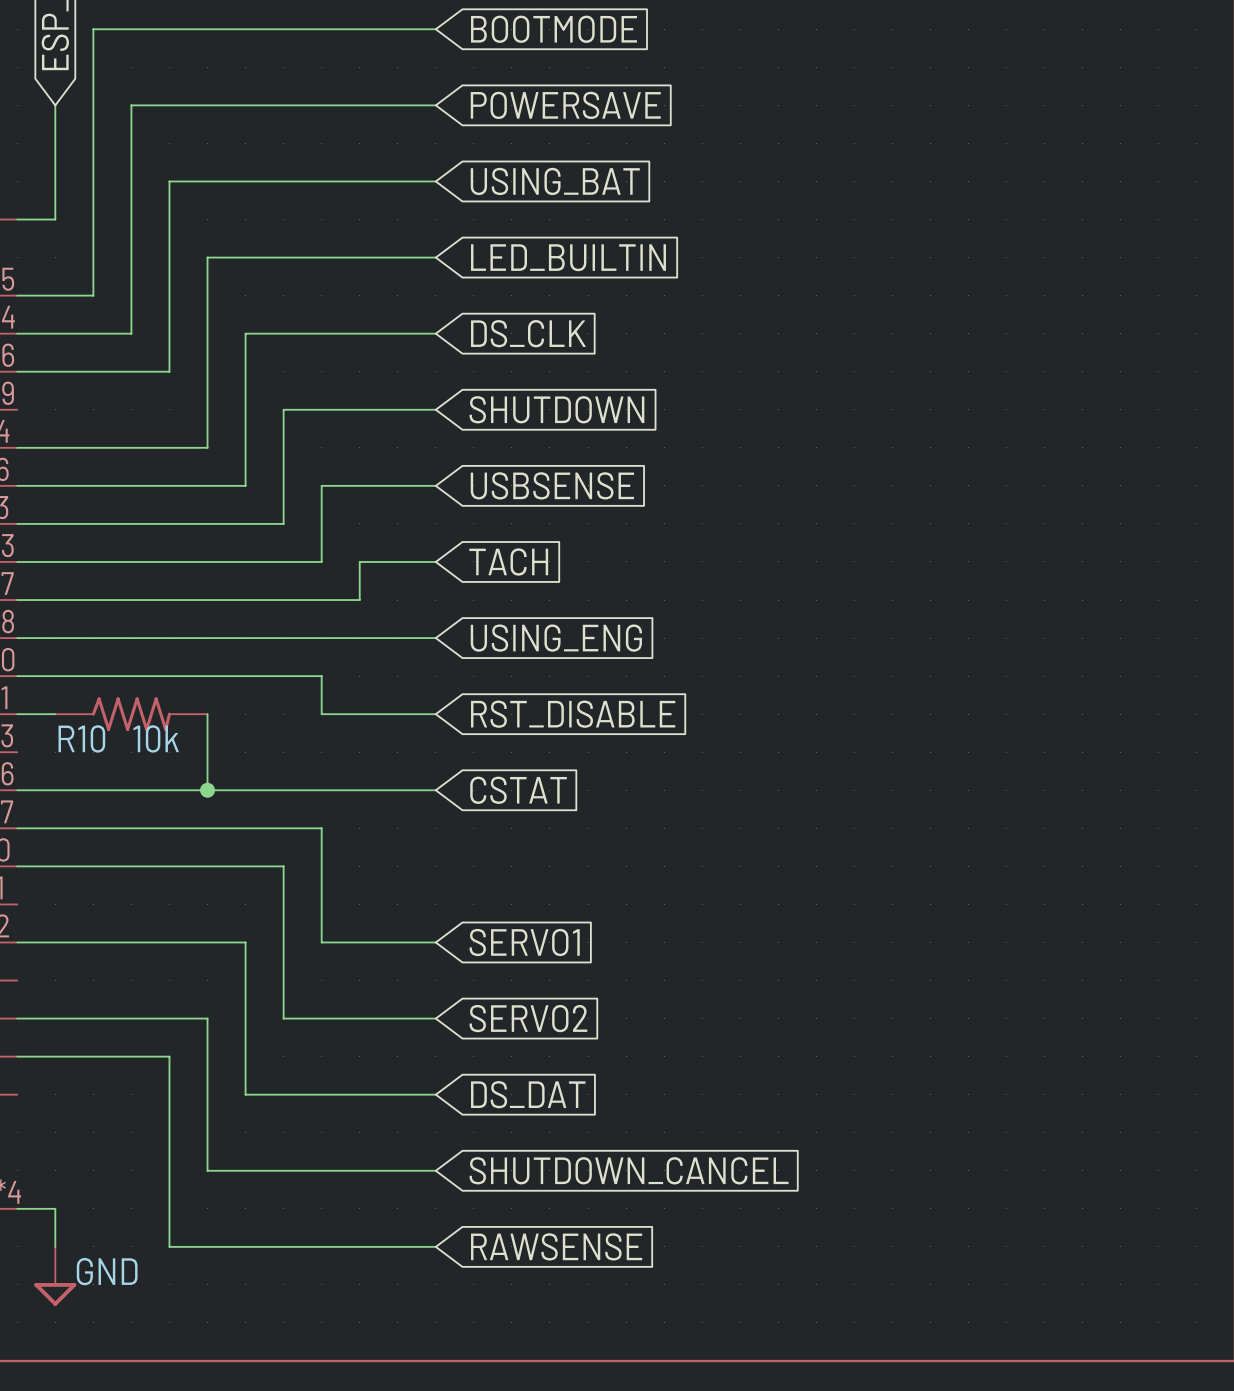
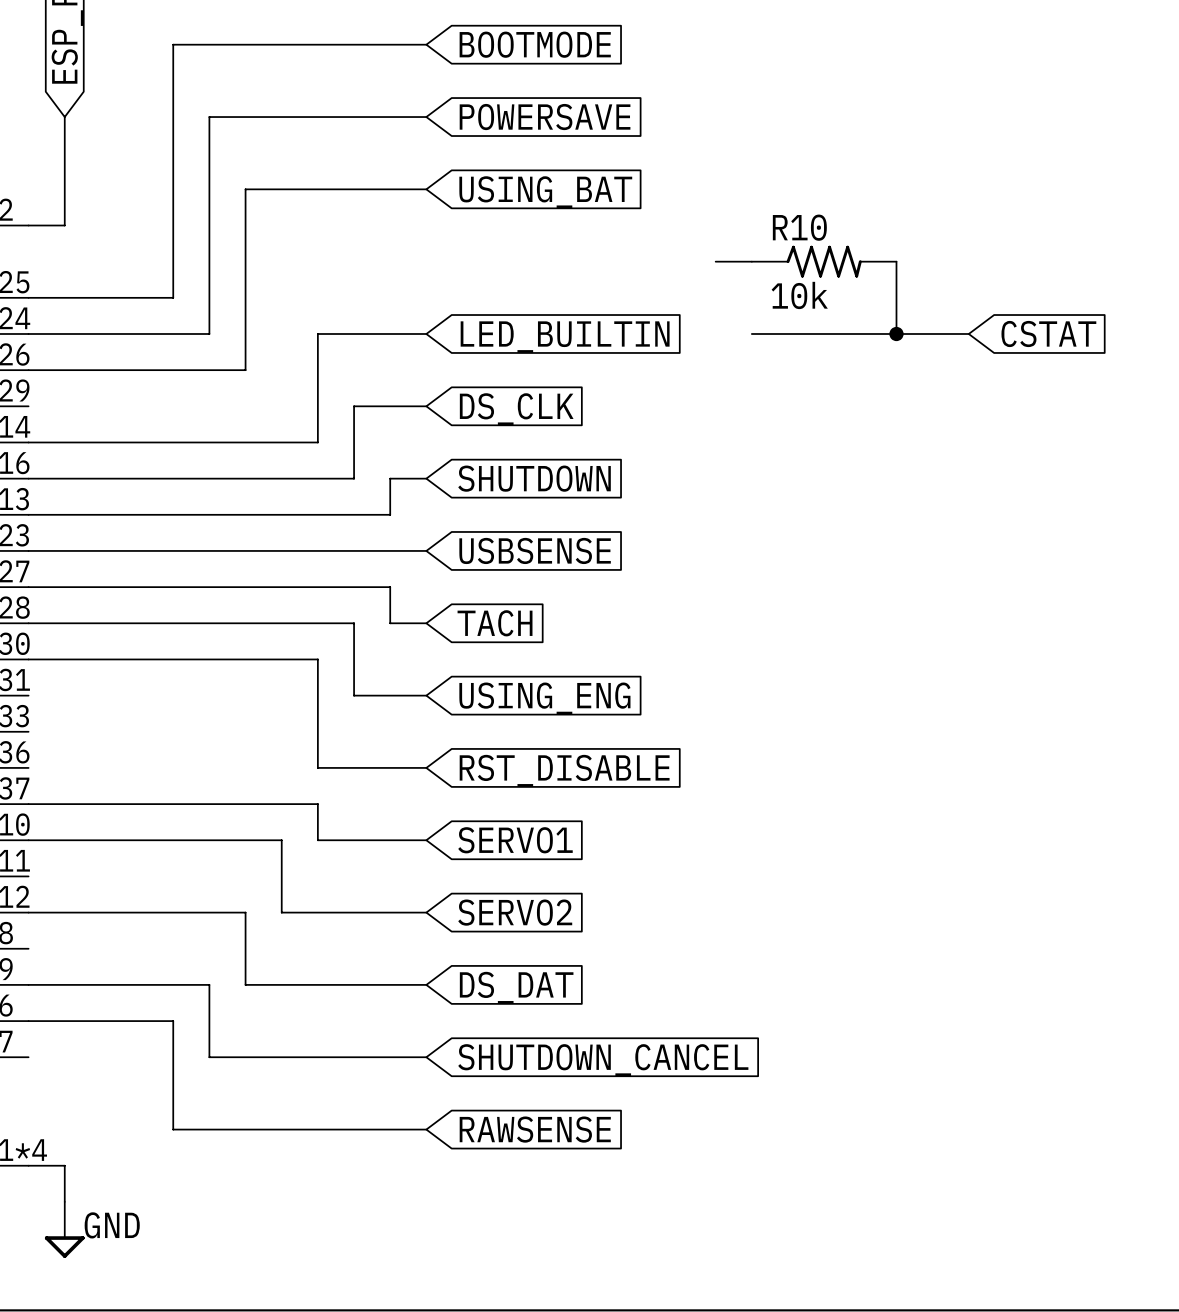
wire: (169, 29) (93, 29) (93, 295) -> (173, 44) (173, 189)
wire: (207, 105) (131, 105) (131, 333) -> (209, 117) (209, 261)
wire: (169, 181) (245, 181) -> (137, 333) (209, 333)
wire: (207, 257) (435, 257) -> none
global label: LED_BUILTIN (568, 257) -> none
wire: none -> (715, 261) (751, 261)
wire: none -> (896, 261) (896, 333)
wire: (169, 295) (169, 371) -> (173, 297) (100, 297)
wire: (207, 333) (207, 447) -> (317, 333) (317, 442) (209, 442)
wire: (245, 333) (321, 333) -> (245, 333) (245, 189)
global label: DS_CLK (528, 333) -> LED_BUILTIN (565, 337)
wire: none -> (751, 333) (968, 333)
junction: none -> (896, 333)
global label: none -> CSTAT (1048, 333)
wire: (245, 371) (245, 485) -> (245, 370) (173, 370)
wire: (359, 409) (283, 409) (283, 523) -> (354, 406) (354, 478)
global label: SHUTDOWN (556, 409) -> DS_CLK (516, 409)
wire: (321, 485) (321, 561) -> (317, 478) (245, 478)
wire: (359, 485) (397, 485) -> (281, 514) (390, 514) (390, 478)
global label: USBSENSE (552, 485) -> SHUTDOWN (534, 478)
wire: (359, 561) (359, 600) -> (354, 550) (317, 550)
global label: TACH (508, 561) -> USBSENSE (535, 550)
wire: (359, 638) (397, 638) -> (354, 587) (390, 587) (390, 623)
global label: USING_ENG (556, 638) -> TACH (495, 623)
wire: (17, 714) (55, 714) -> none
R10 position: (131, 714) -> (824, 261)
wire: (207, 714) (207, 790) -> none
wire: (321, 714) (359, 714) -> (354, 623) (354, 695)
global label: RST_DISABLE (573, 714) -> USING_ENG (544, 698)
R10 name position: R10 (81, 738) -> R10 (799, 227)
R10 value position: 10k (156, 738) -> 10k (799, 295)
wire: (17, 790) (321, 790) -> (317, 695) (317, 767)
junction: (207, 790) -> none
global label: CSTAT (518, 790) -> RST_DISABLE (564, 770)
wire: (321, 866) (321, 942) -> (281, 912) (317, 912)
wire: none -> (317, 840) (426, 840)
global label: none -> SERVO1 (515, 840)
wire: (283, 942) (283, 1018) -> (245, 984) (281, 984)
global label: SERVO1 (524, 942) -> SERVO2 (515, 912)
wire: (245, 1018) (245, 1094) -> (209, 1057) (245, 1057)
global label: SERVO2 (528, 1018) -> DS_DAT (516, 987)
wire: (207, 1094) (207, 1170) -> (173, 1129) (209, 1129)
global label: DS_DAT (528, 1094) -> SHUTDOWN_CANCEL (603, 1060)
wire: (169, 1170) (169, 1246) (435, 1246) -> none
global label: SHUTDOWN_CANCEL (629, 1170) -> RAWSENSE (535, 1129)
global label: RAWSENSE (556, 1246) -> none

